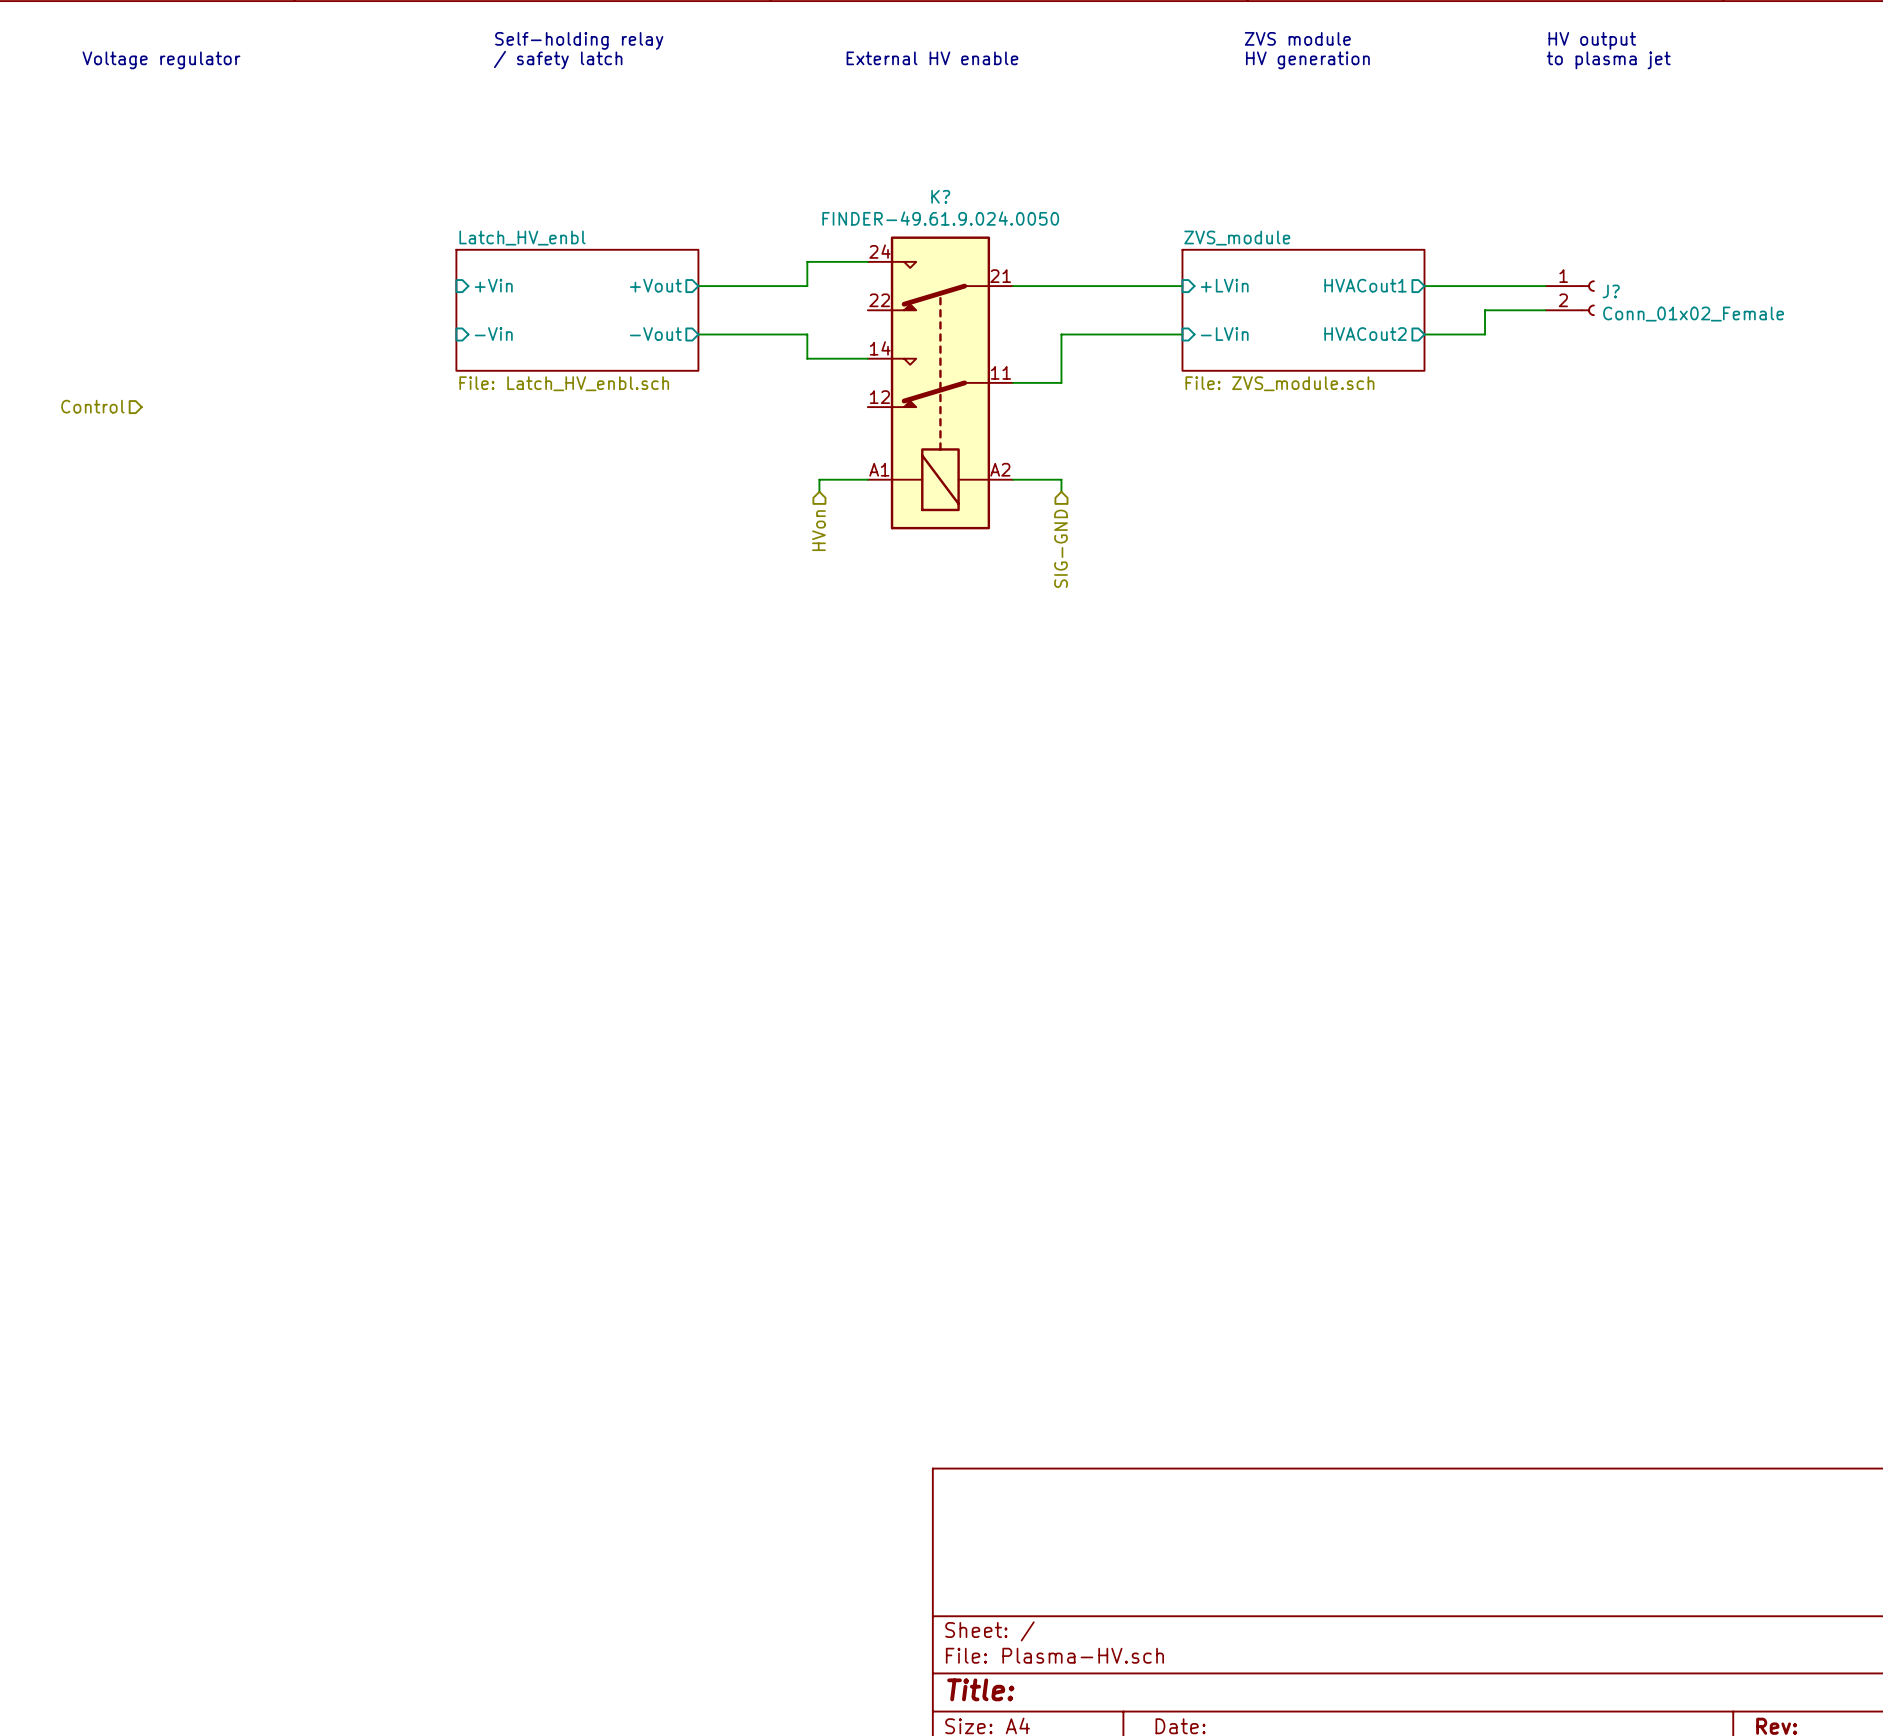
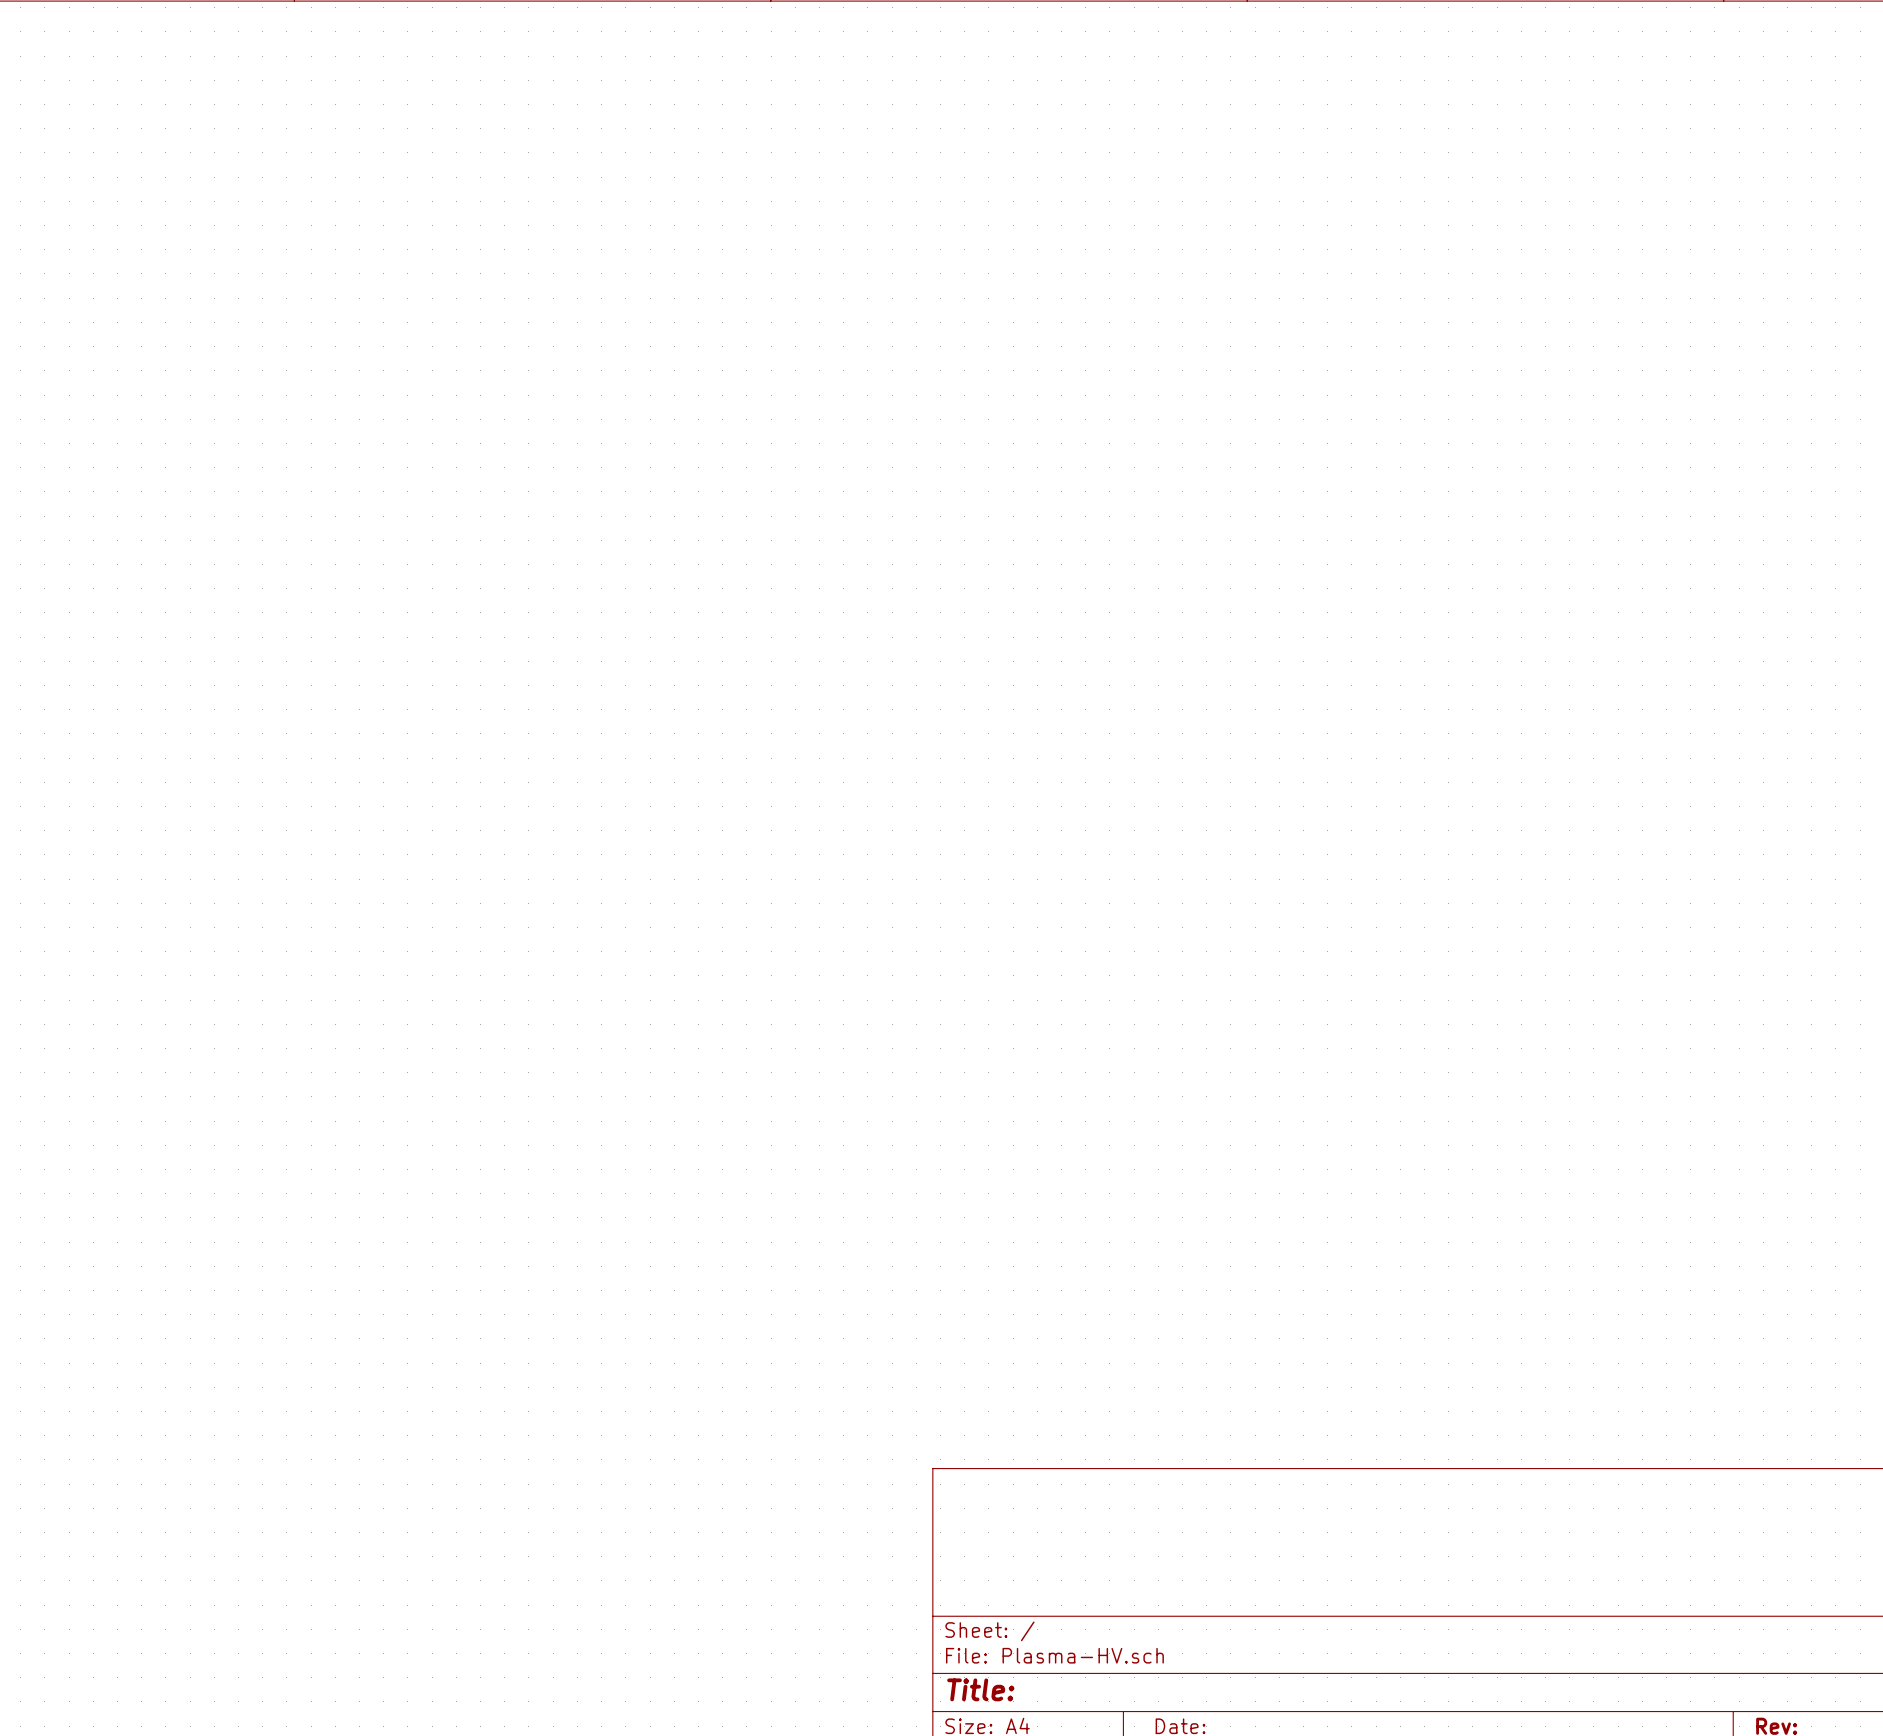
text: ZVS module (1297, 38) -> none
text: Self-holding relay (579, 40) -> none
text: HV output (1592, 40) -> none
text: External HV enable (932, 58) -> none
text: Voltage regulator (161, 60) -> none
text: / safety latch (558, 60) -> none
text: HV generation (1307, 60) -> none
text: to plasma jet (1608, 60) -> none
wire: (867, 261) (807, 261) (807, 286) (698, 286) -> none
sheet pin: +Vin (493, 285) -> none
sheet pin: +Vout (655, 285) -> none
sheet pin: +LVin (1224, 285) -> none
sheet pin: HVACout1 (1365, 285) -> none
wire: (1013, 286) (1182, 286) -> none
wire: (1424, 286) (1545, 286) -> none
J?: Conn_01x02_Female (1570, 298) -> none
sheet Latch_HV_enbl: File: Latch_HV_enbl.sch (577, 310) -> none
sheet ZVS_module: File: ZVS_module.sch (1303, 310) -> none
wire: (1545, 310) (1485, 310) (1485, 334) (1424, 334) -> none
sheet pin: -Vin (493, 334) -> none
sheet pin: -Vout (655, 334) -> none
wire: (698, 334) (807, 334) (807, 358) (867, 358) -> none
wire: (1182, 334) (1061, 334) (1061, 382) (1013, 382) -> none
sheet pin: -LVin (1224, 334) -> none
sheet pin: HVACout2 (1365, 334) -> none
K?: FINDER-49.61.9.024.0050 (940, 382) -> none
hierarchical label: Control (92, 406) -> none
wire: (867, 479) (819, 479) (819, 491) -> none
wire: (1013, 479) (1061, 479) (1061, 491) -> none
hierarchical label: HVon (818, 530) -> none
hierarchical label: SIG-GND (1061, 548) -> none

